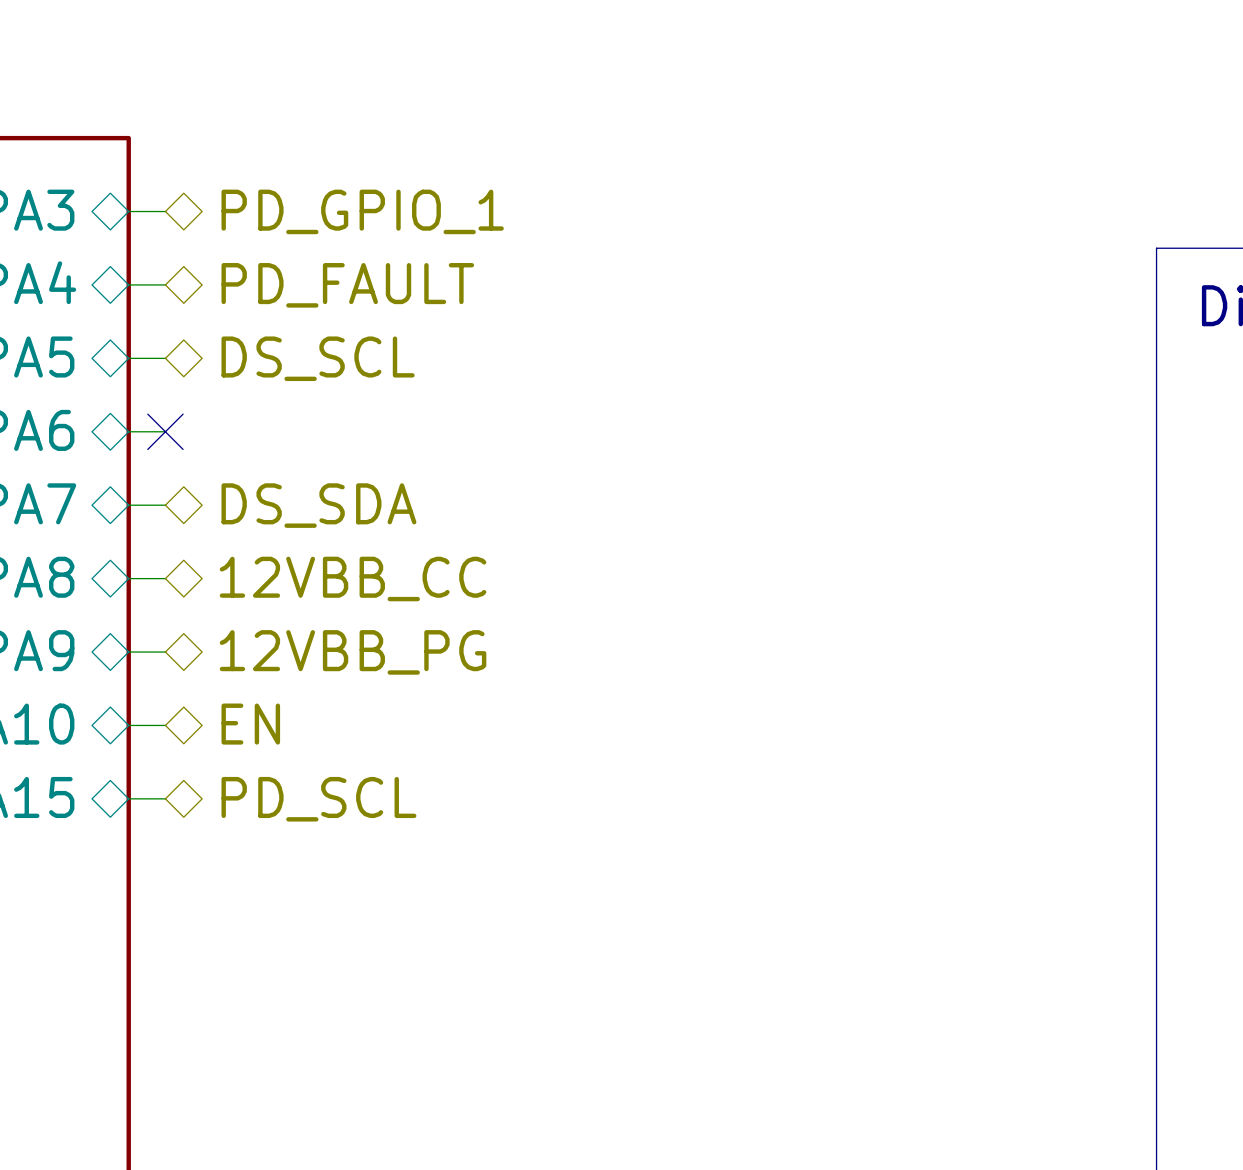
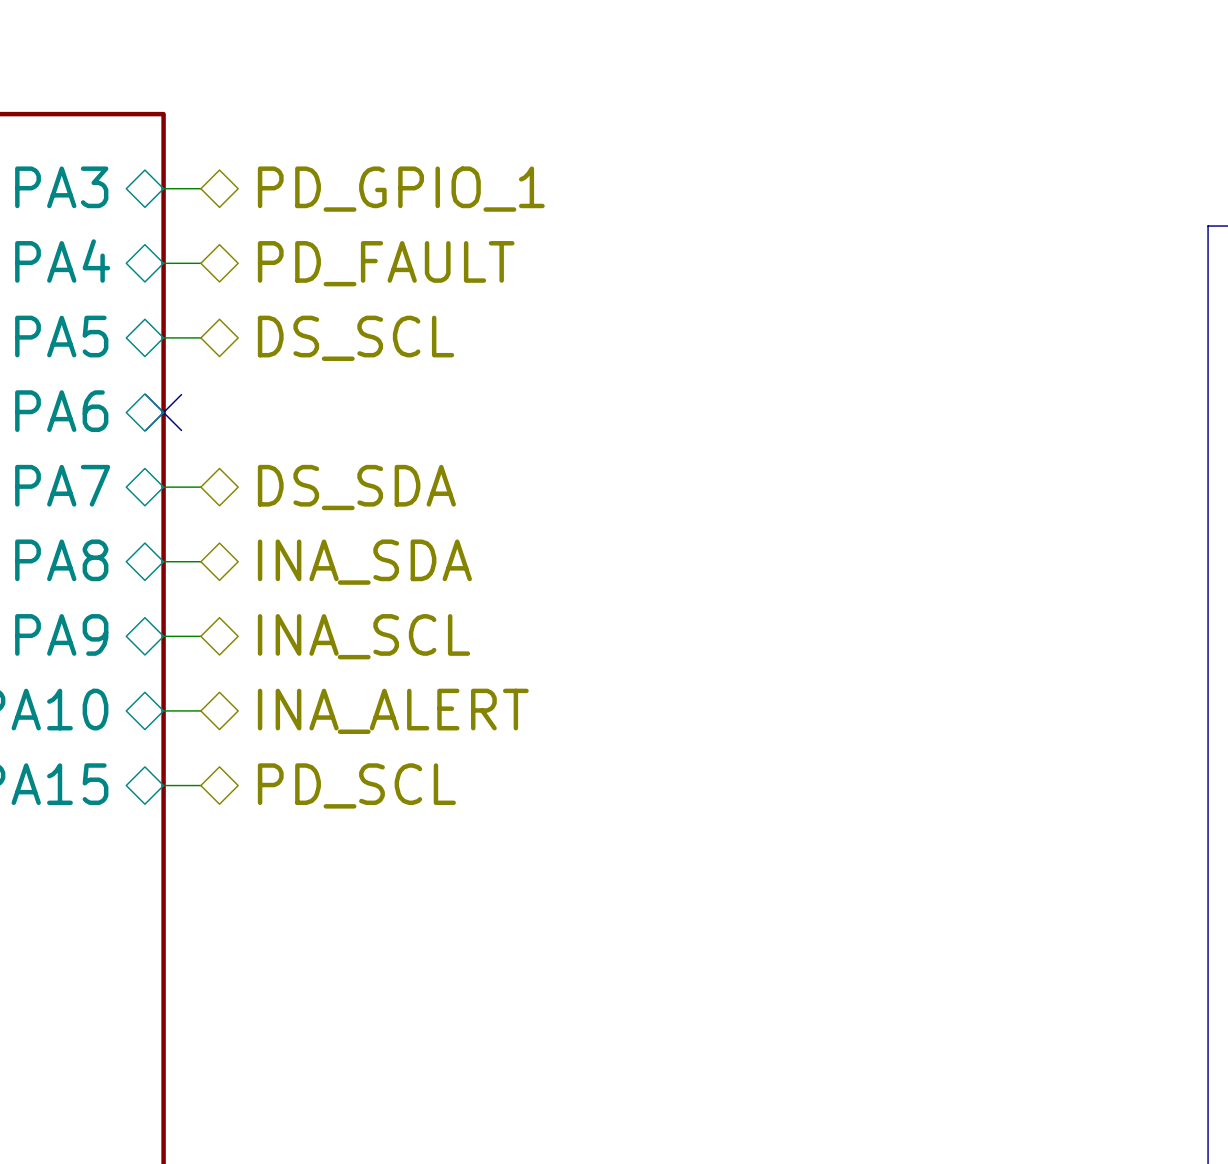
wire: (128, 431) (165, 431) -> none
no-connect mark position: (165, 431) -> (163, 412)
hierarchical label: 12VBB_CC (353, 578) -> INA_SDA (364, 562)
hierarchical label: 12VBB_PG (353, 652) -> INA_SCL (363, 636)
hierarchical label: EN (250, 724) -> INA_ALERT (393, 711)

